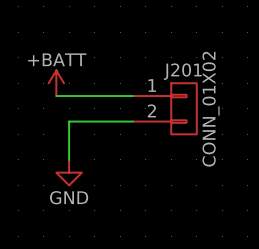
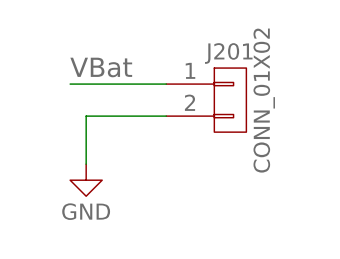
label: none -> VBat (101, 67)
power symbol: +BATT (56, 83) -> none

